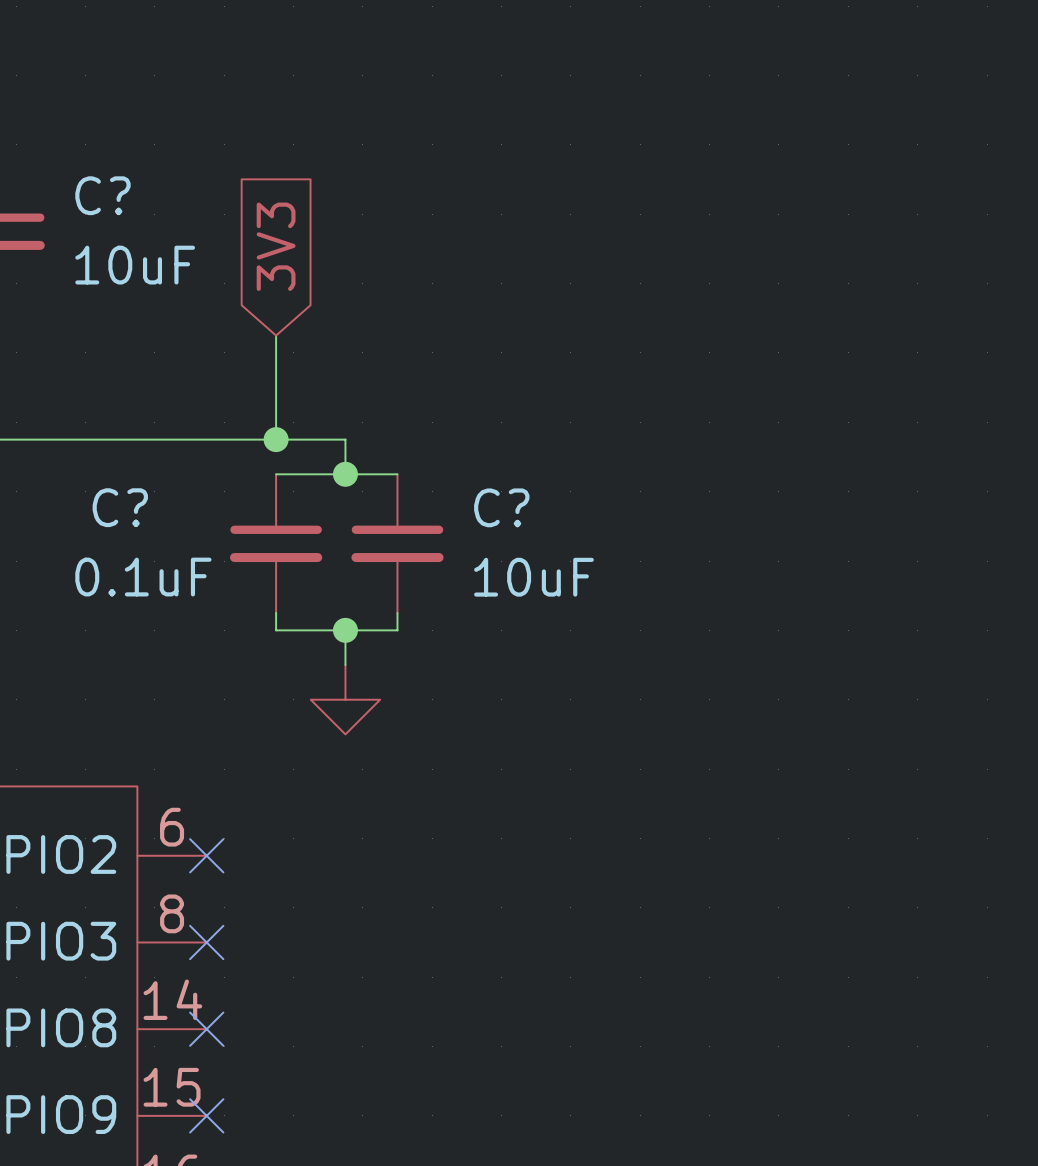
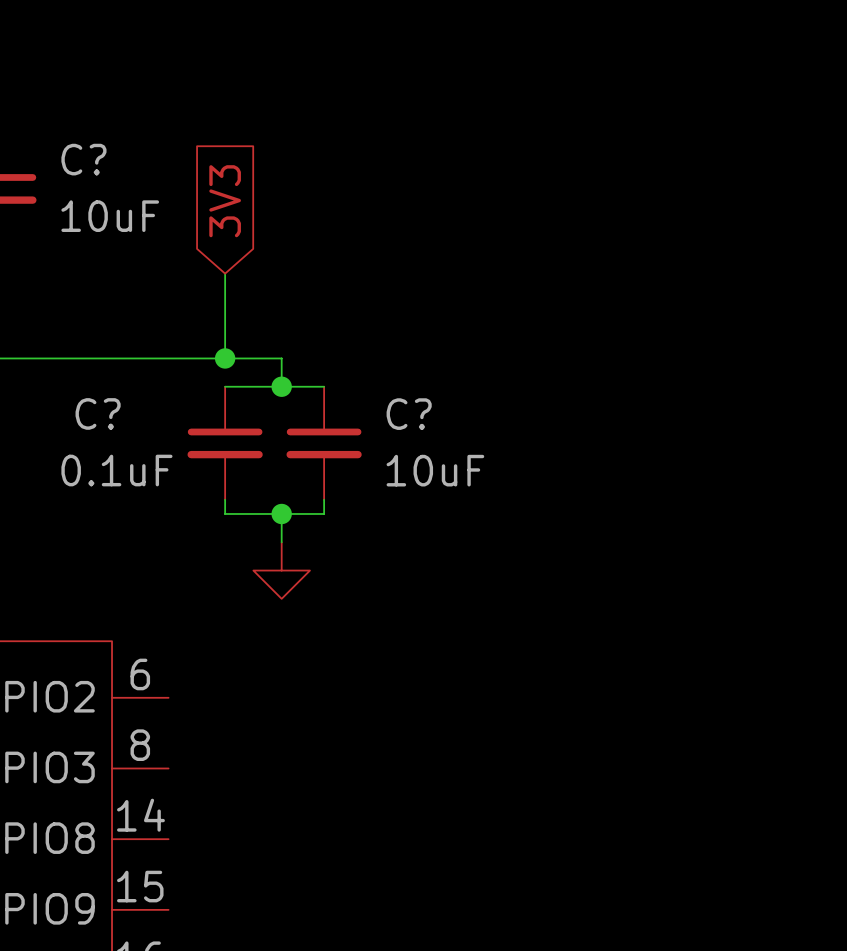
no-connect mark: (206, 855) -> none
no-connect mark: (206, 942) -> none
no-connect mark: (206, 1029) -> none
no-connect mark: (206, 1115) -> none

